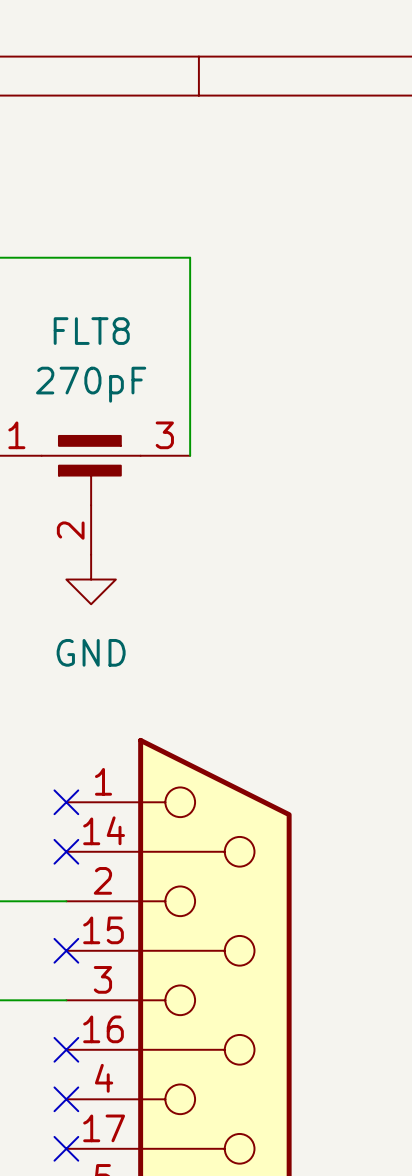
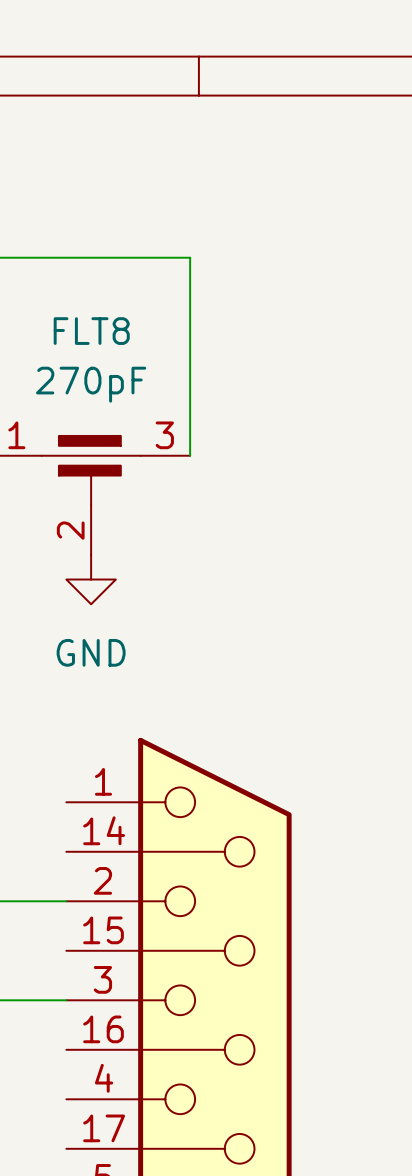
no-connect mark: (66, 802) -> none
no-connect mark: (66, 851) -> none
no-connect mark: (66, 950) -> none
no-connect mark: (66, 1049) -> none
no-connect mark: (66, 1099) -> none
no-connect mark: (66, 1148) -> none

